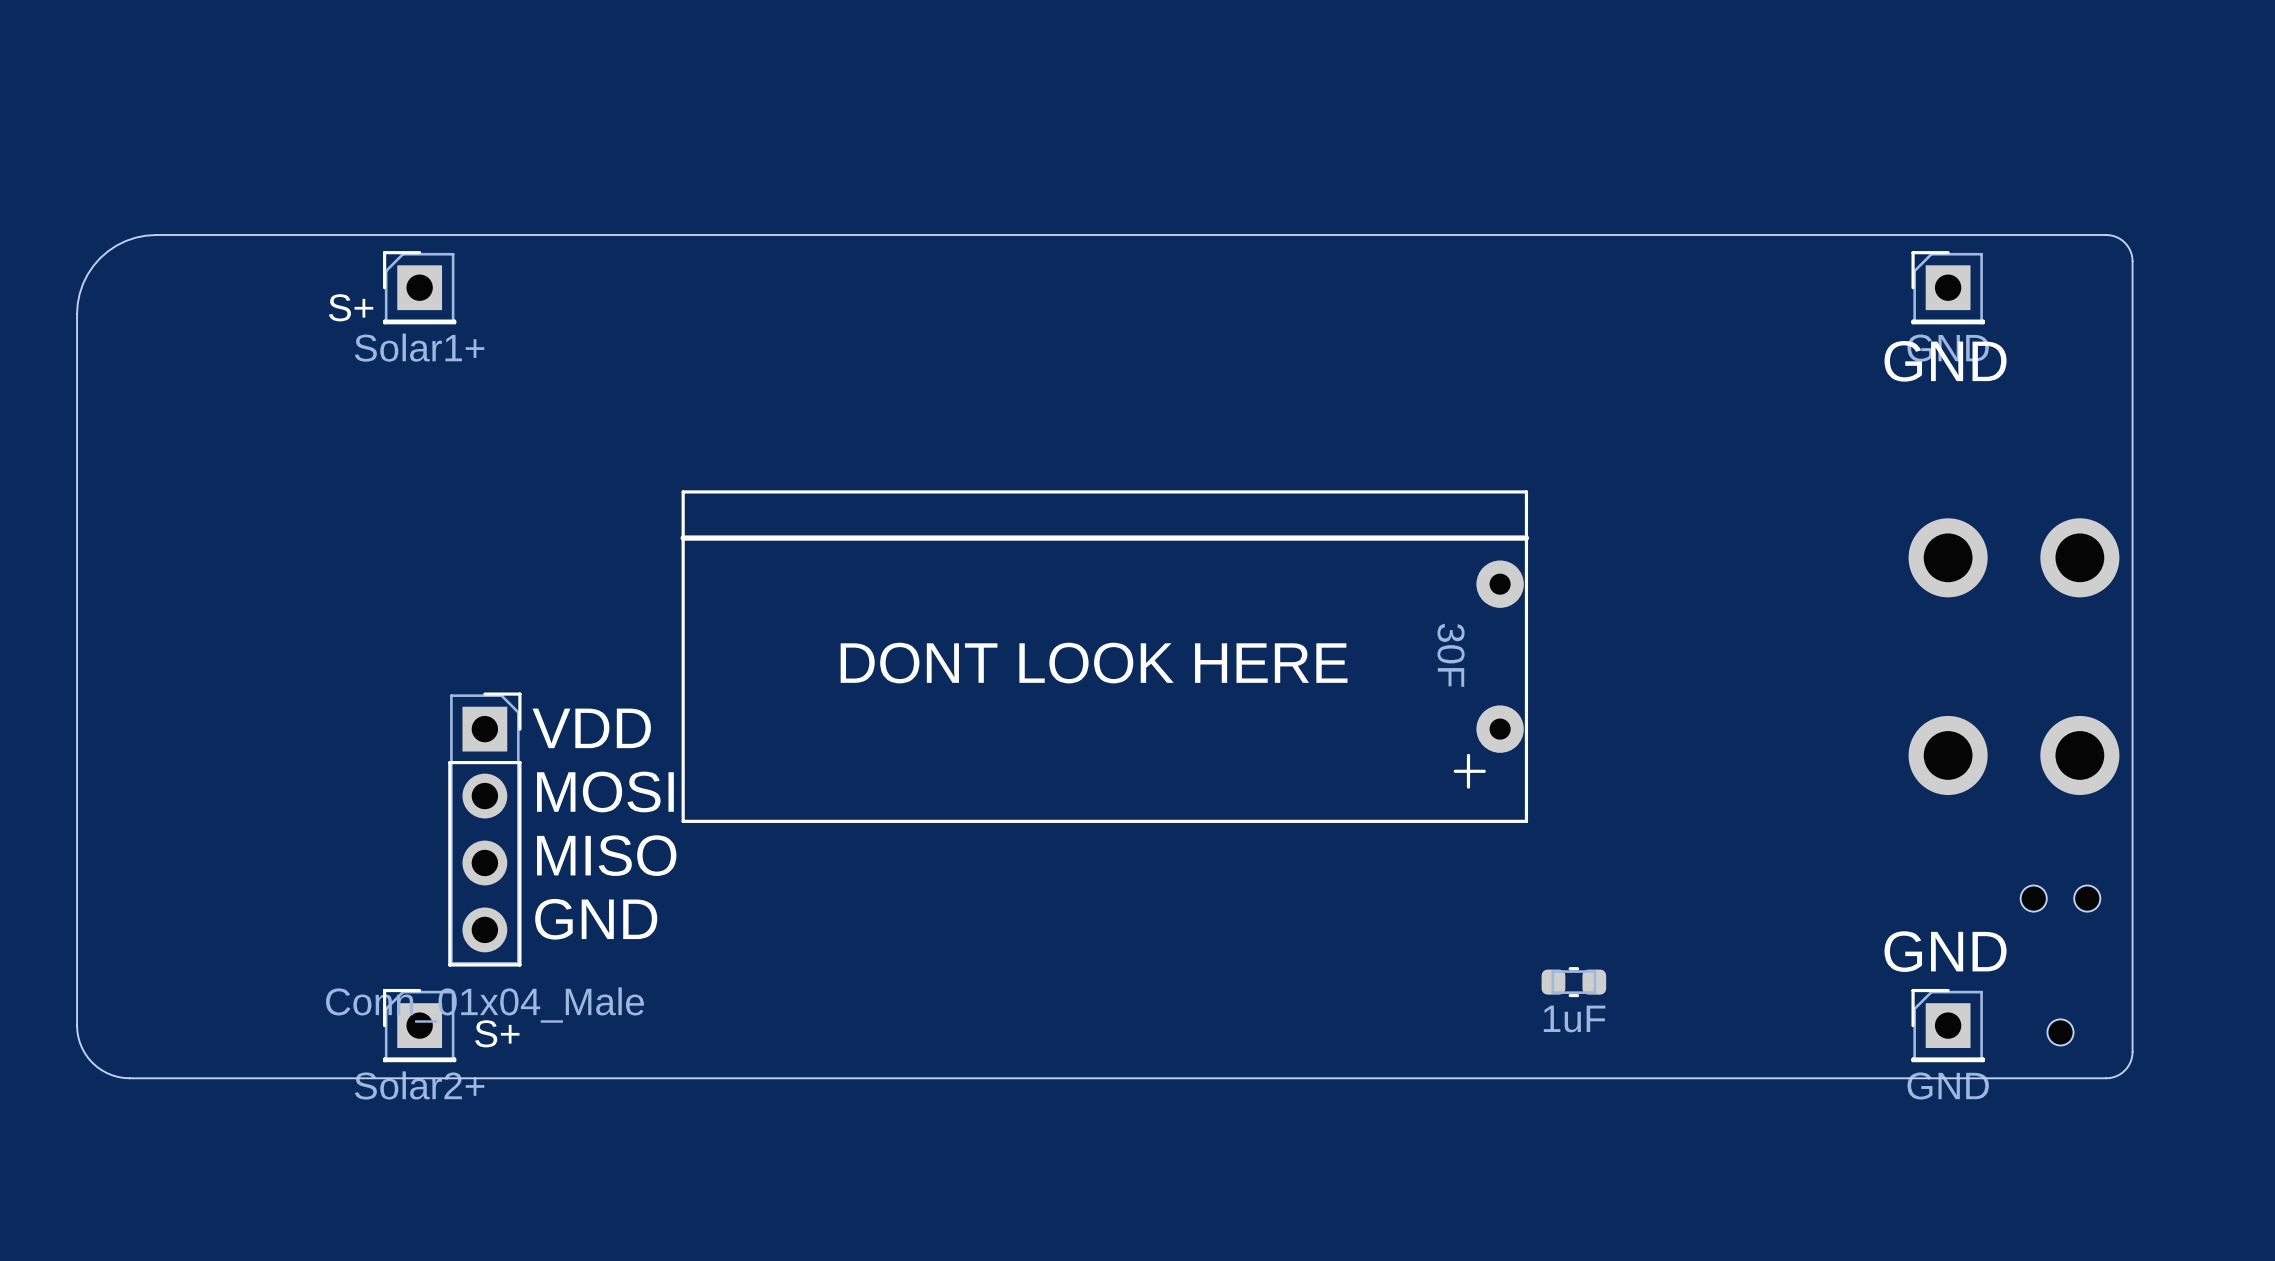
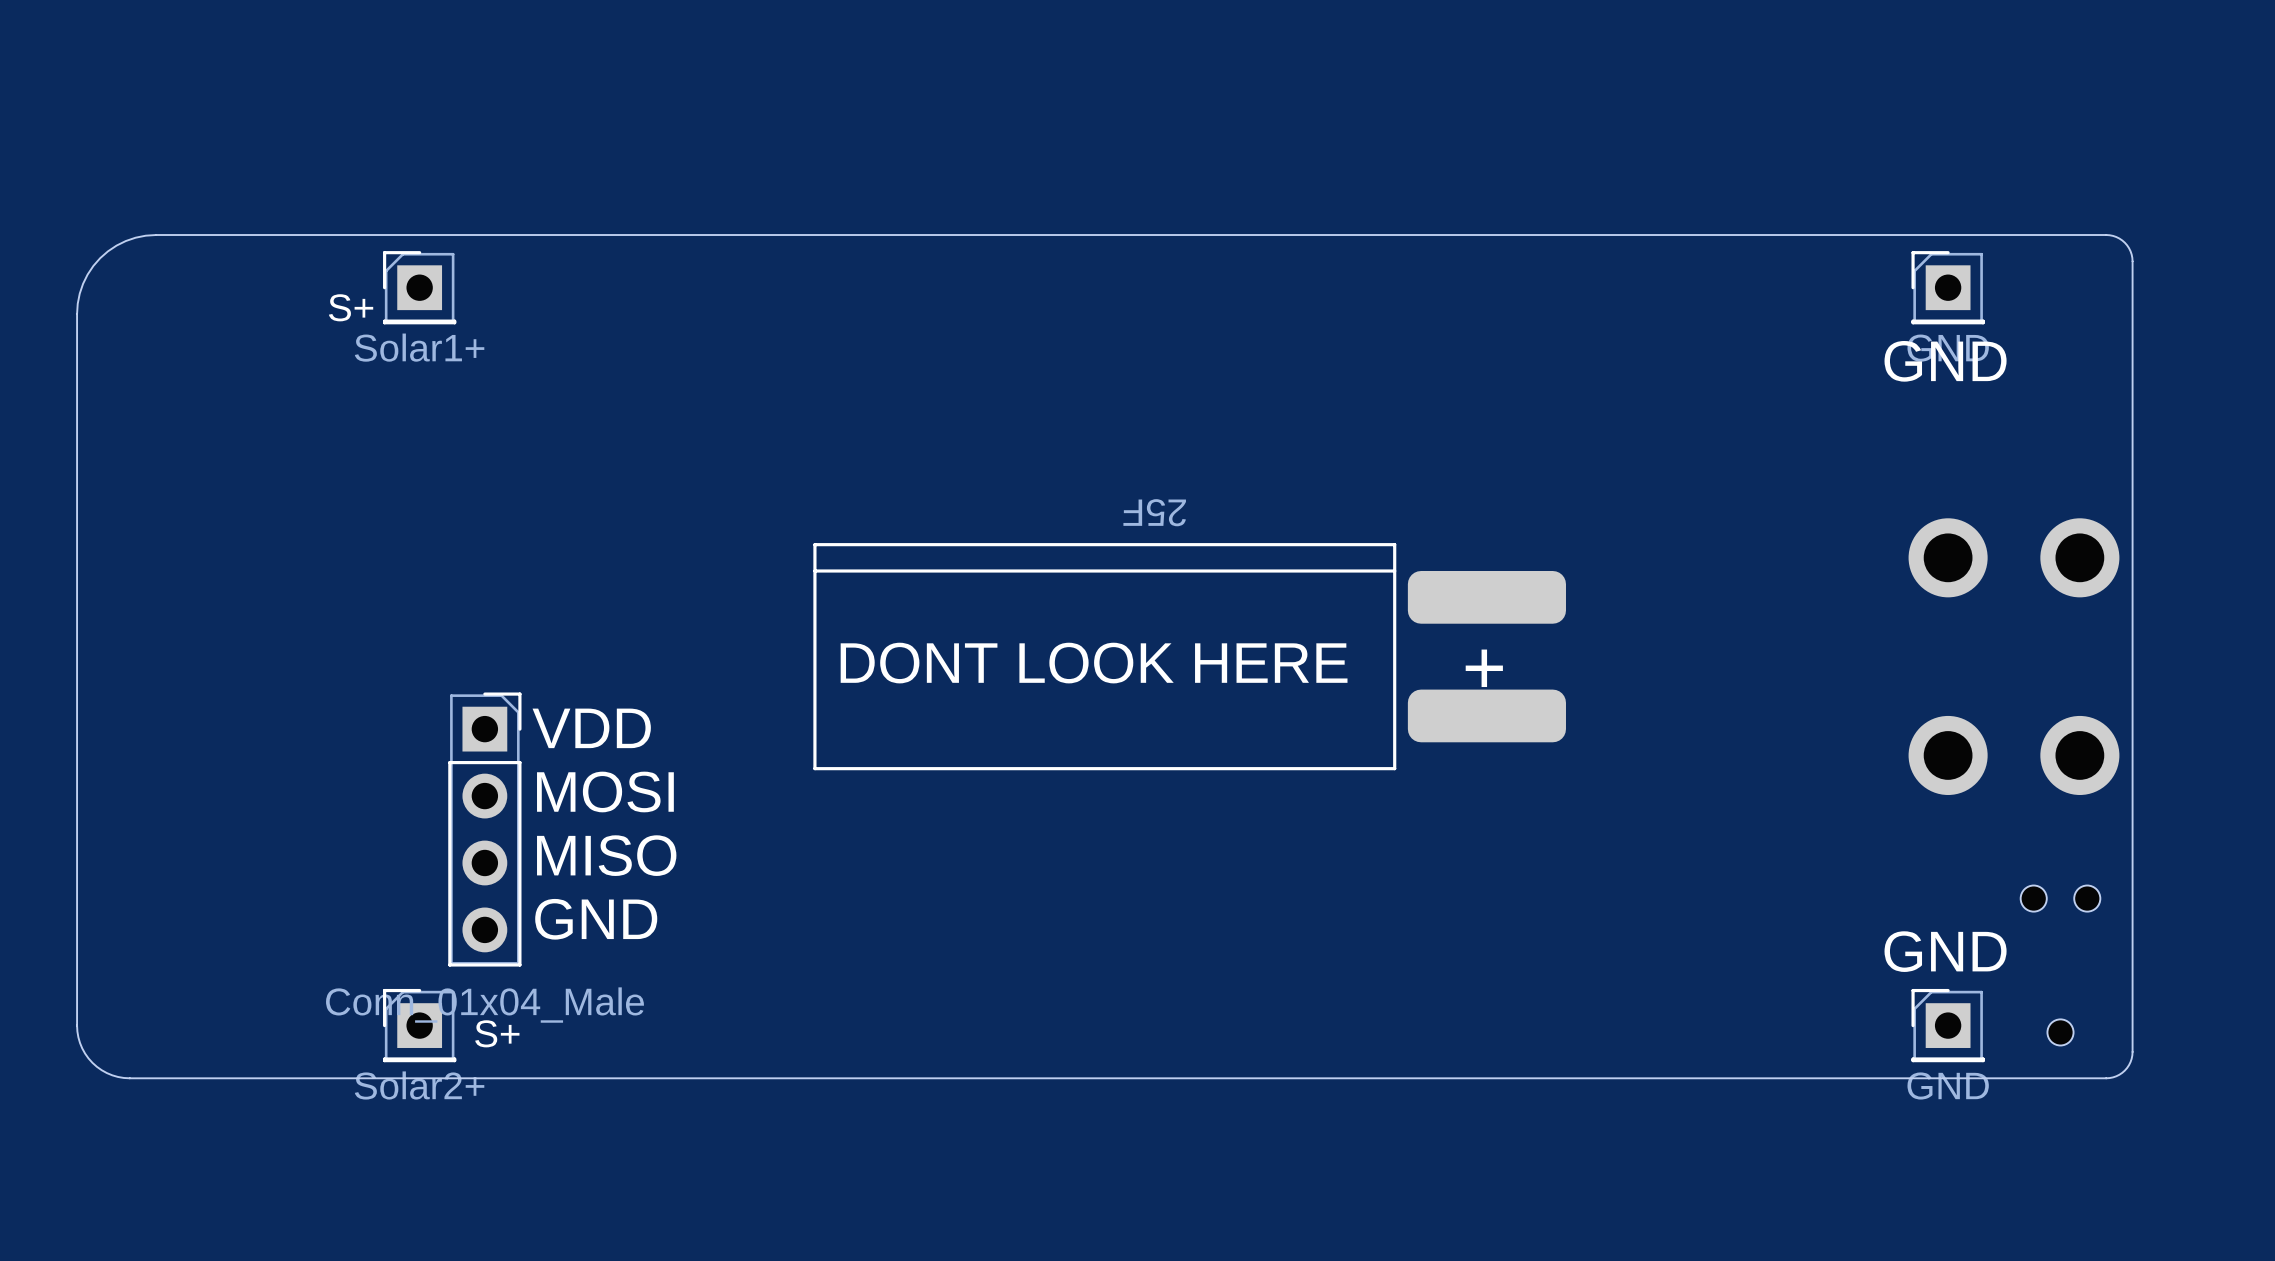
part: 30F (1104, 656) -> none
part: none -> 25F (1189, 656)
part: 1uF (1573, 982) -> none

